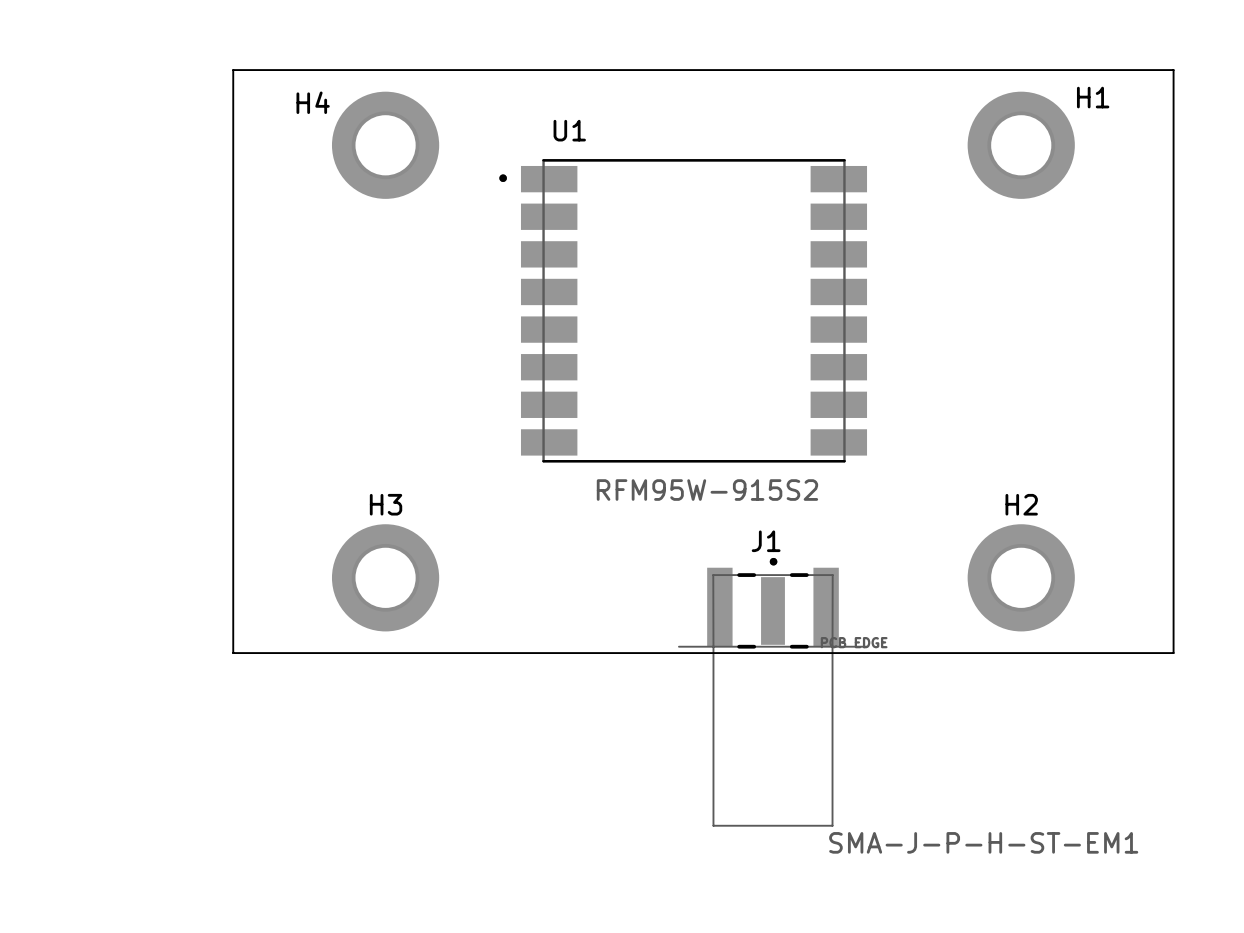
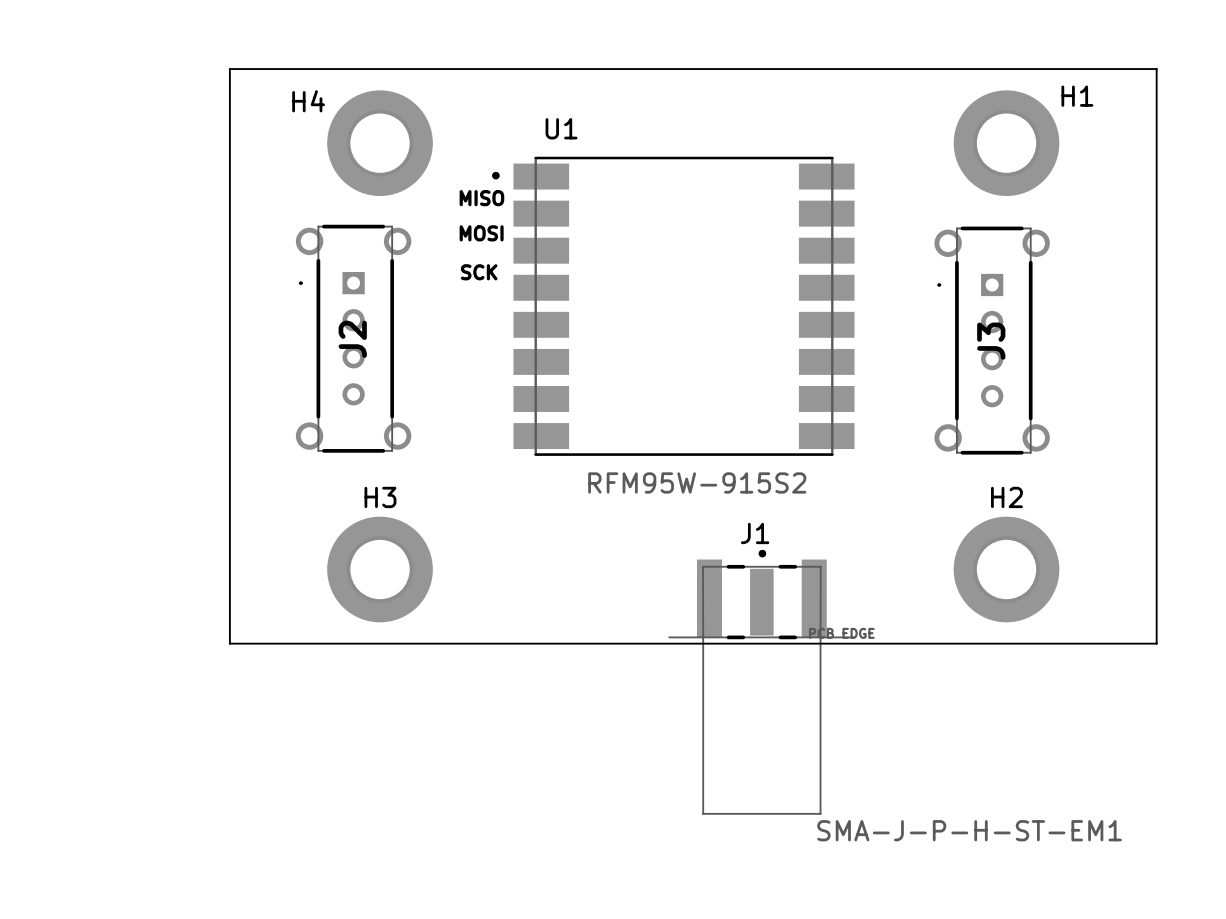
text: none -> MISO (481, 198)
text: none -> MOSI (481, 233)
text: none -> SCK (479, 272)
J2: none -> (353, 338)
J3: none -> (992, 340)

